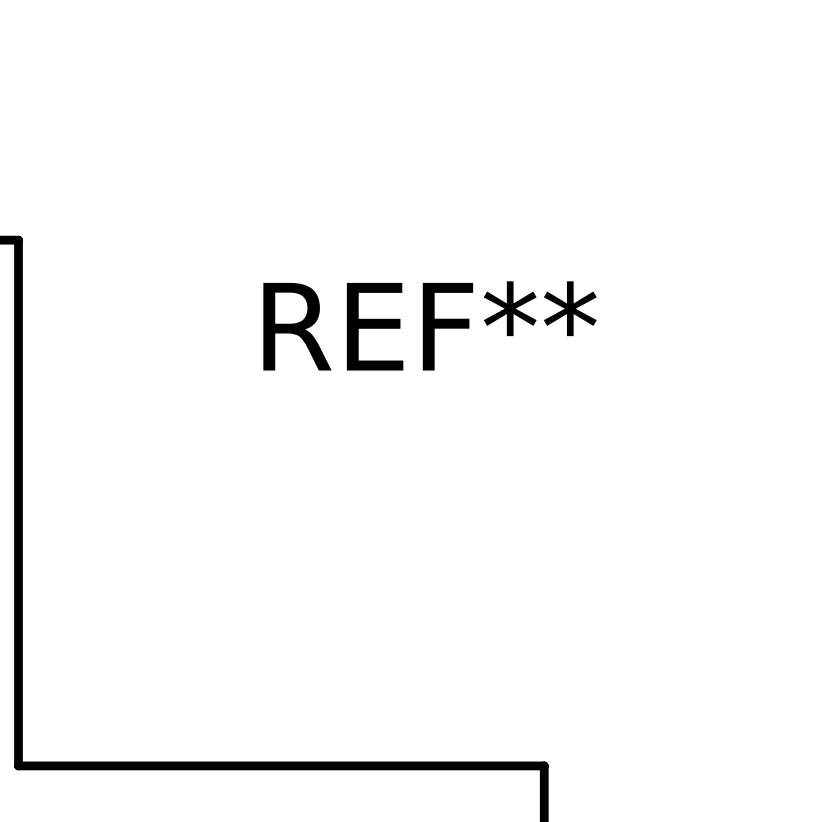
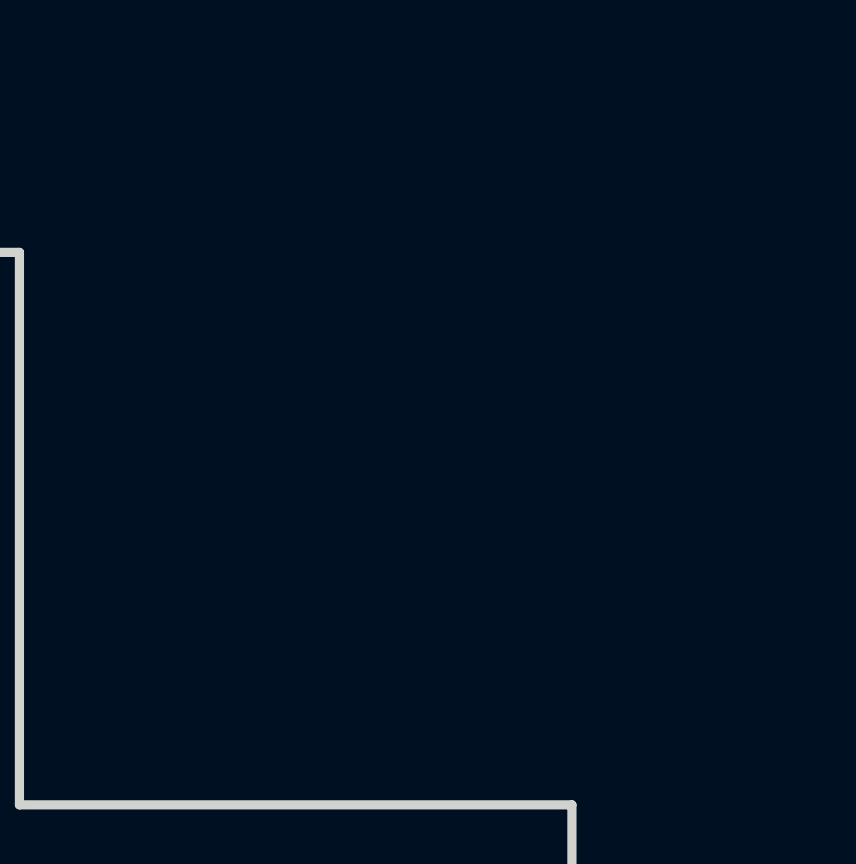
REF**: (430, 325) -> none

